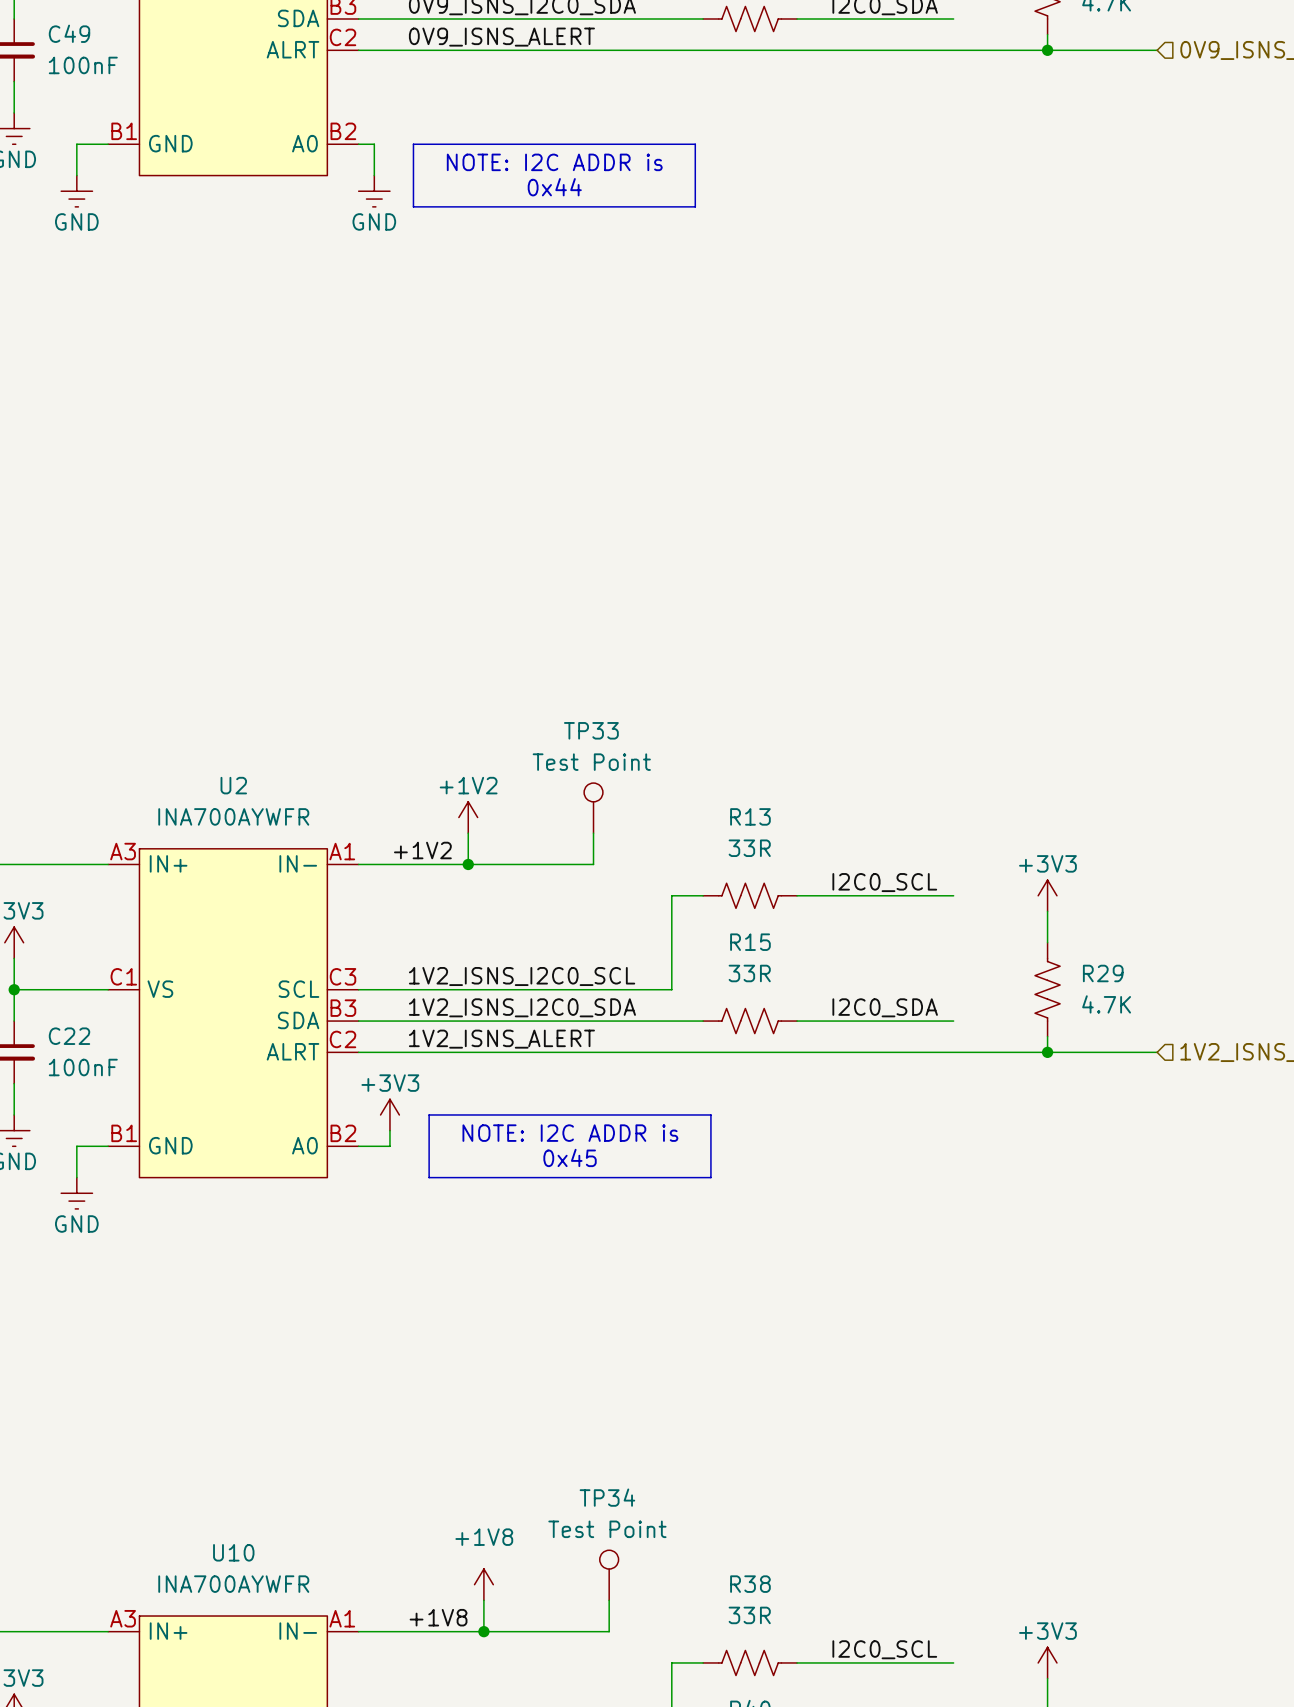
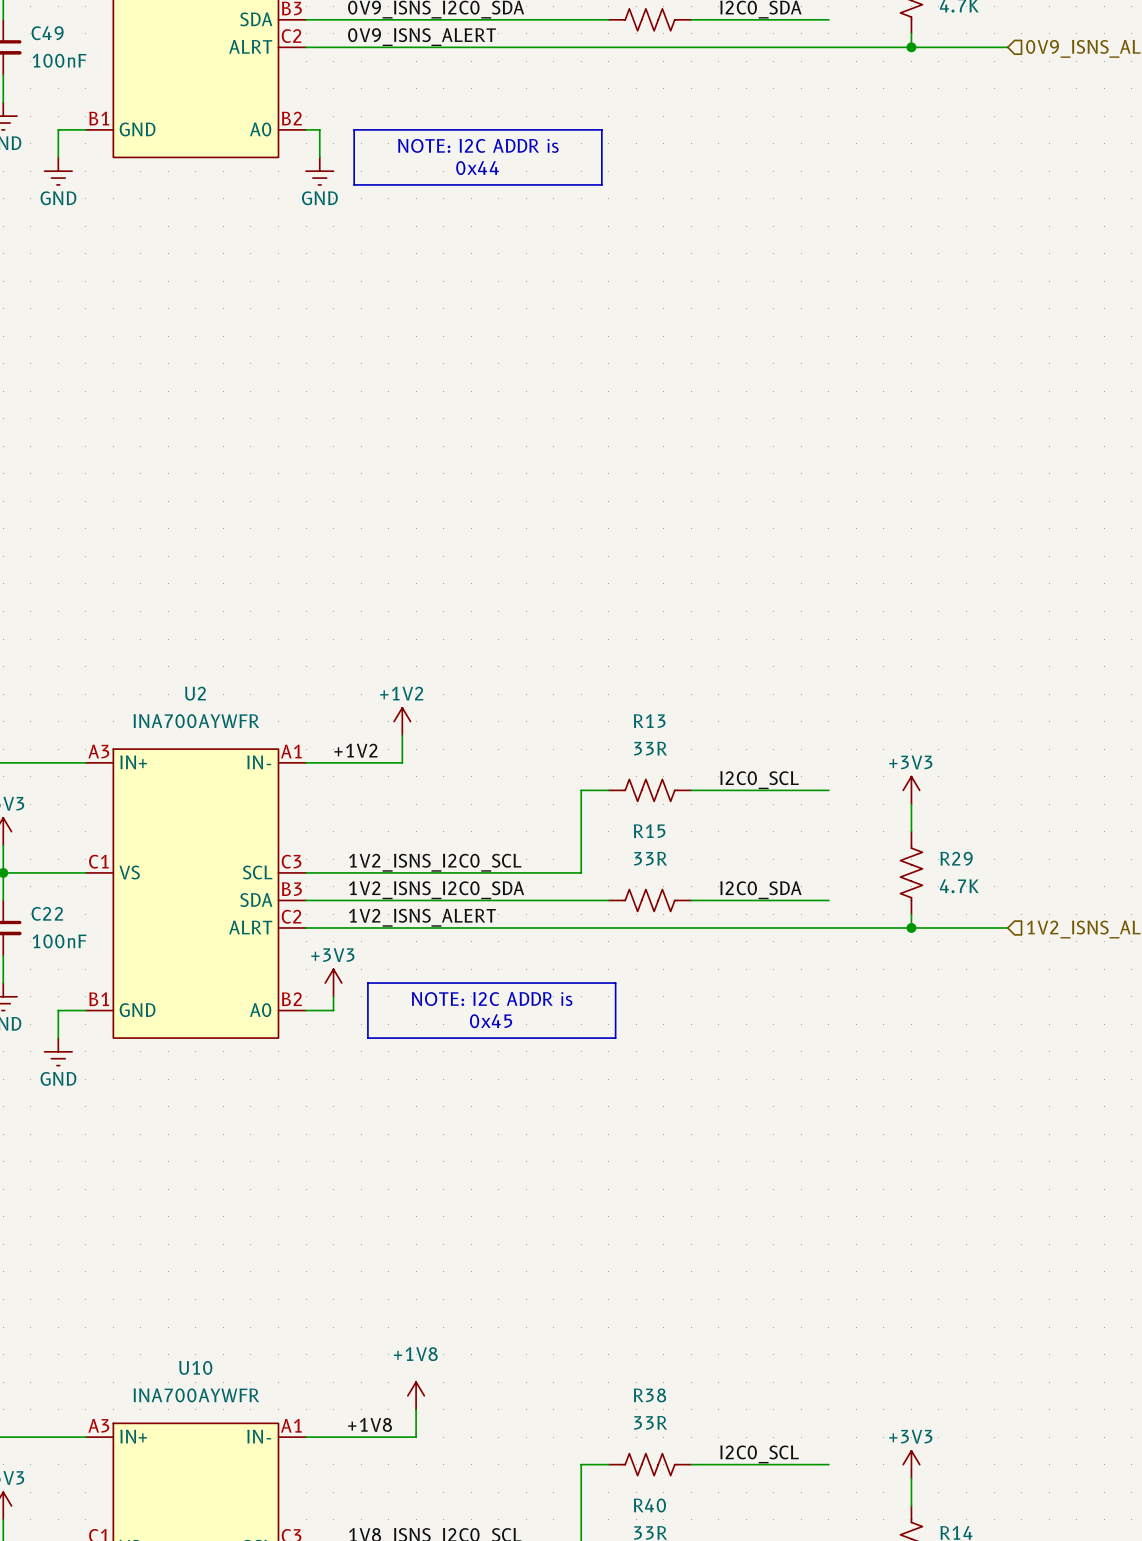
TP33: Test Point (593, 808) -> none
wire: (593, 833) (593, 864) (468, 864) -> none
junction: (468, 864) -> none
TP34: Test Point (609, 1575) -> none
wire: (609, 1600) (609, 1631) (483, 1631) -> none
junction: (483, 1631) -> none

